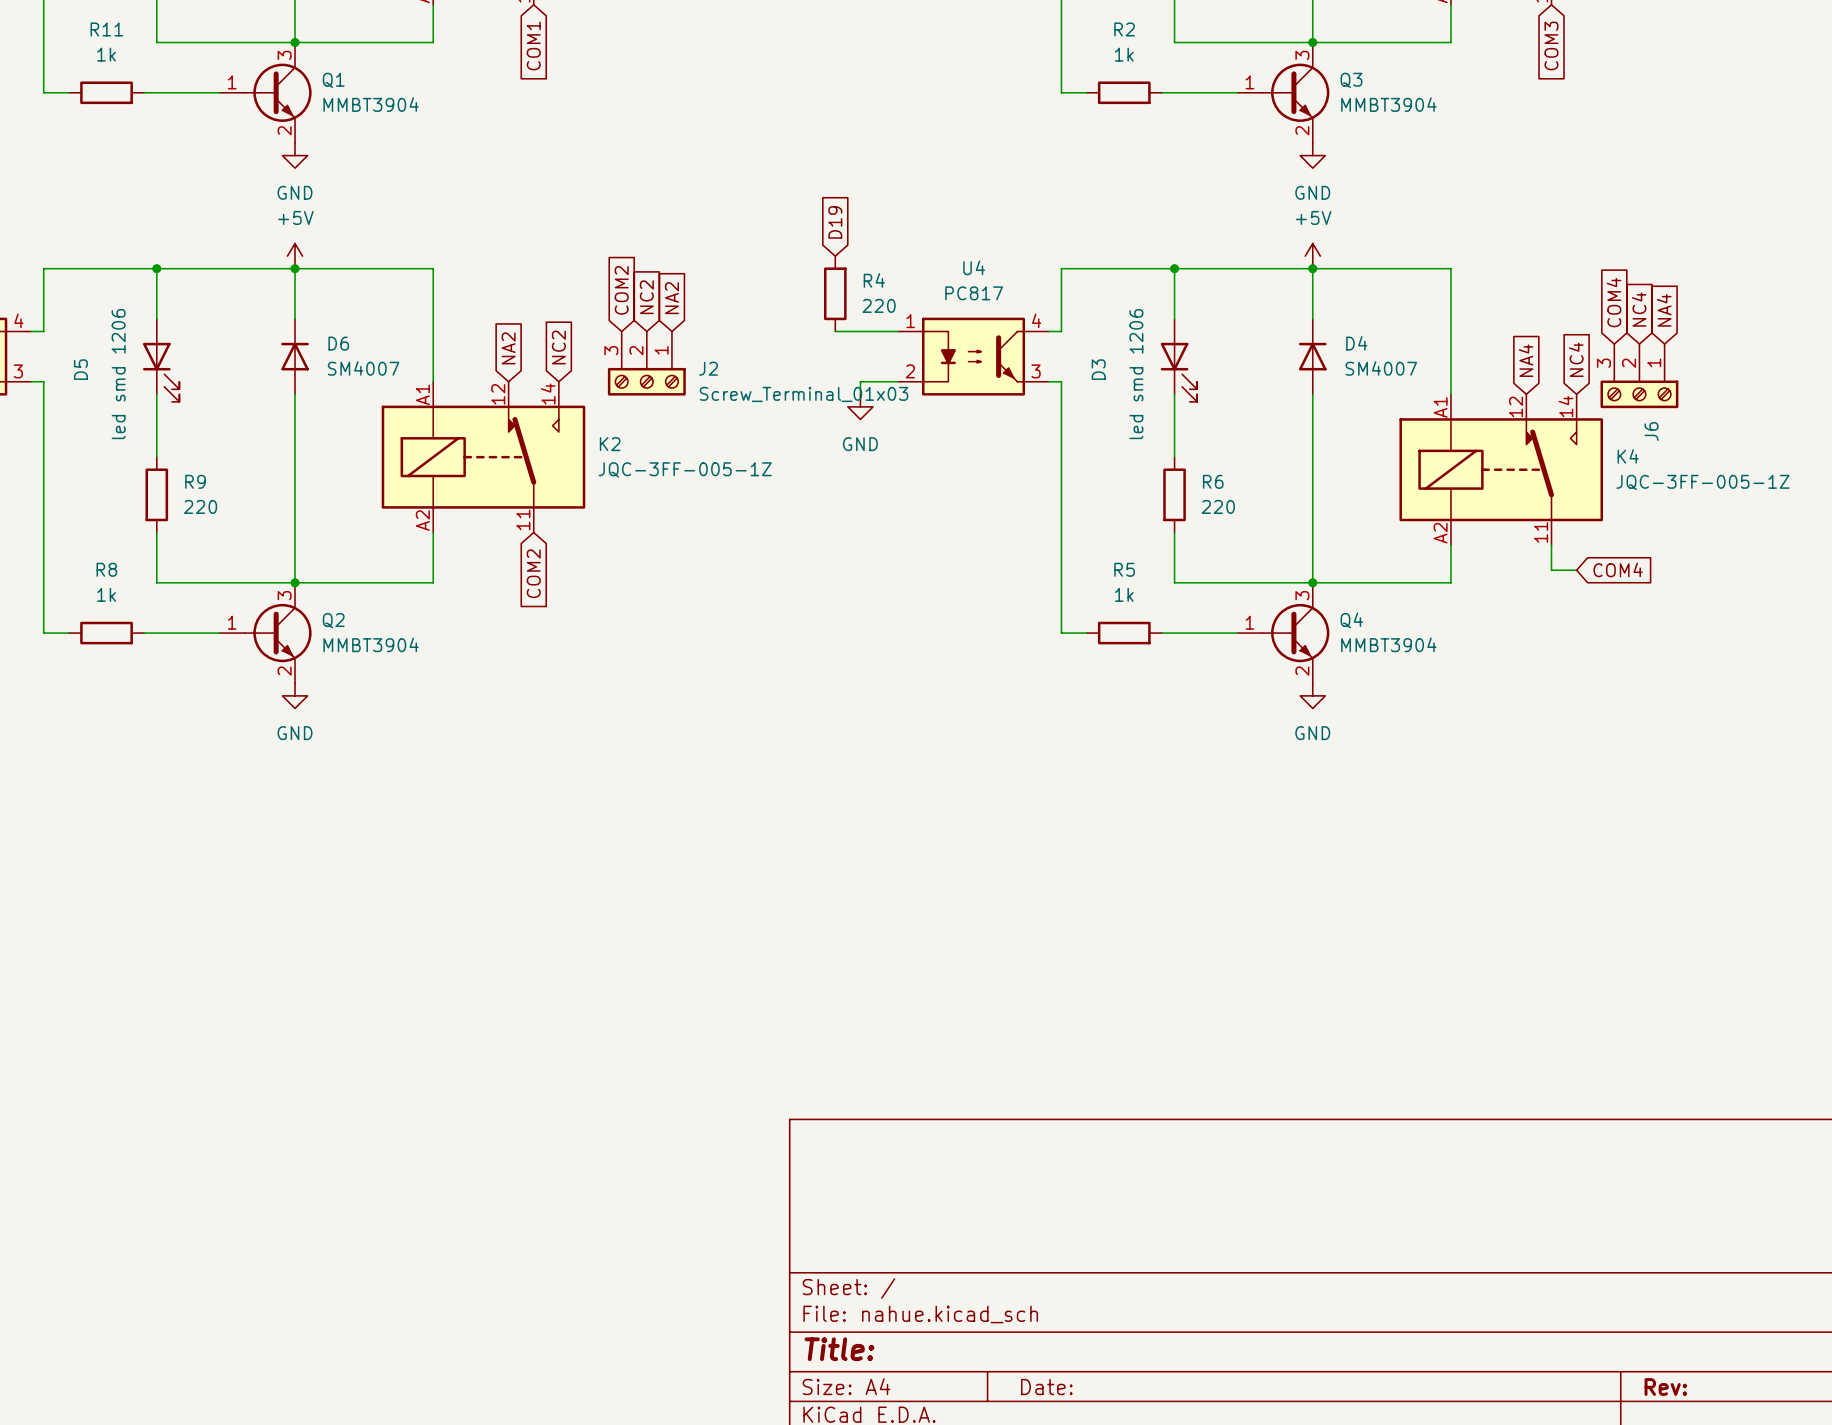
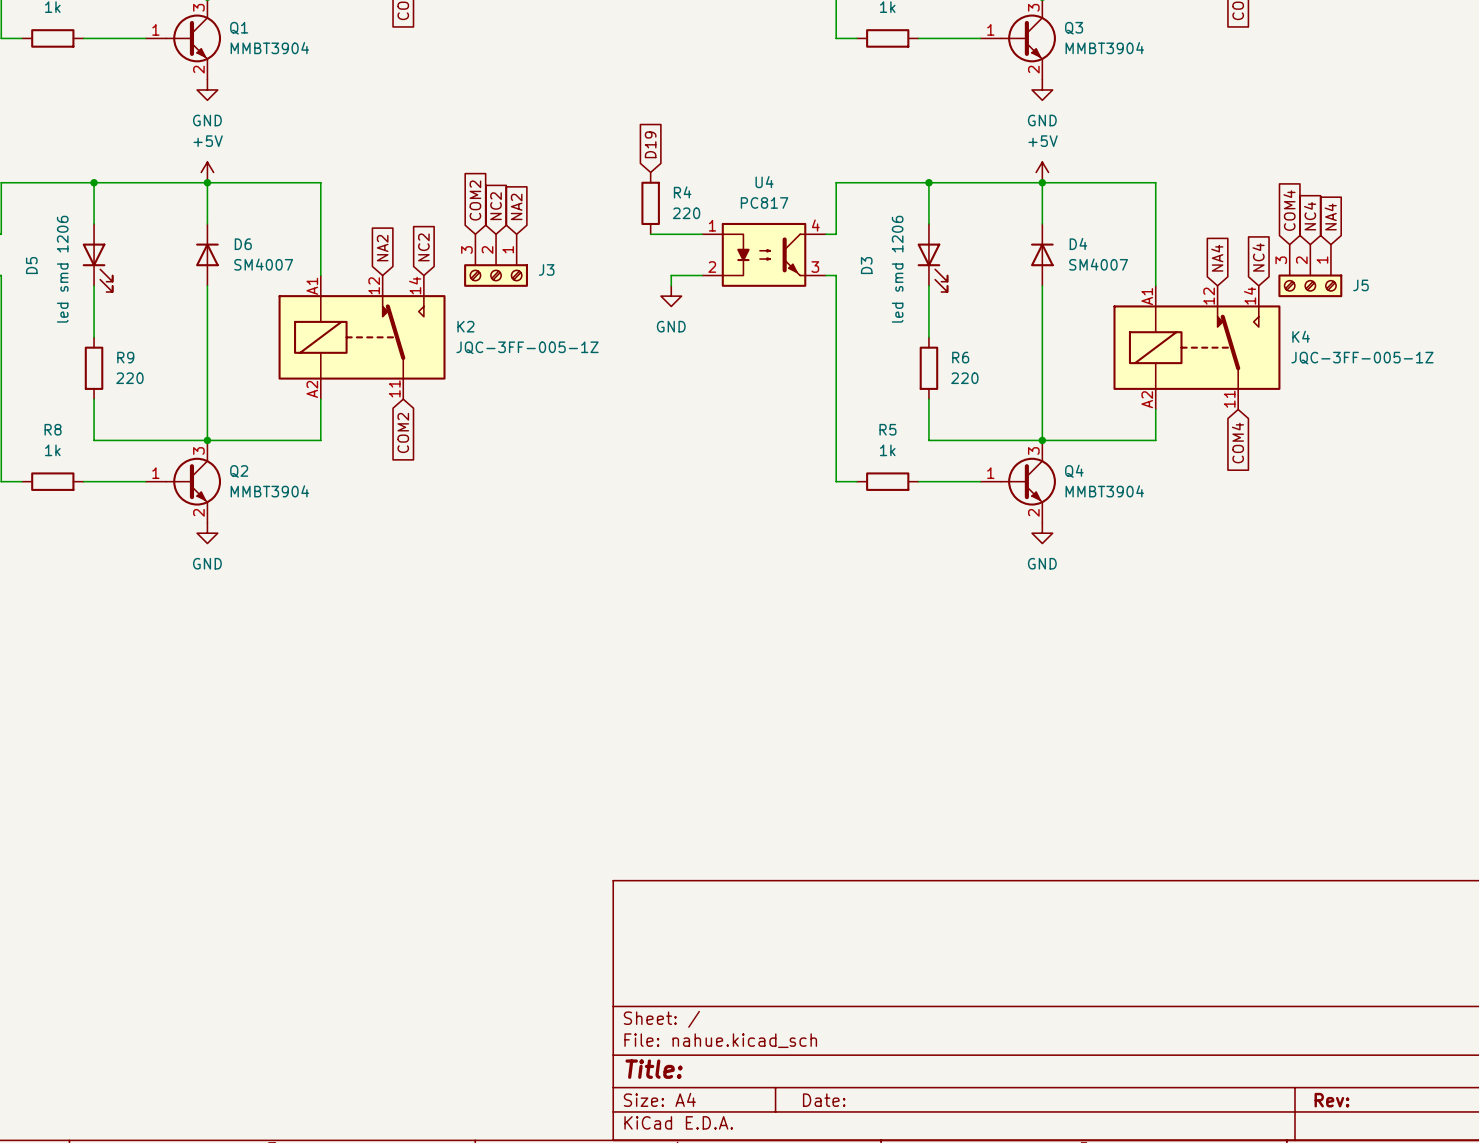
J2 name: J2 (708, 368) -> J3 (546, 269)
J2 value: Screw_Terminal_01x03 (803, 394) -> none
J6 name: J6 (1651, 431) -> J5 (1360, 285)
wire: (1551, 545) (1551, 570) (1576, 570) -> none
global label rotation: 0° (1618, 569) -> 90° clockwise (1237, 443)

